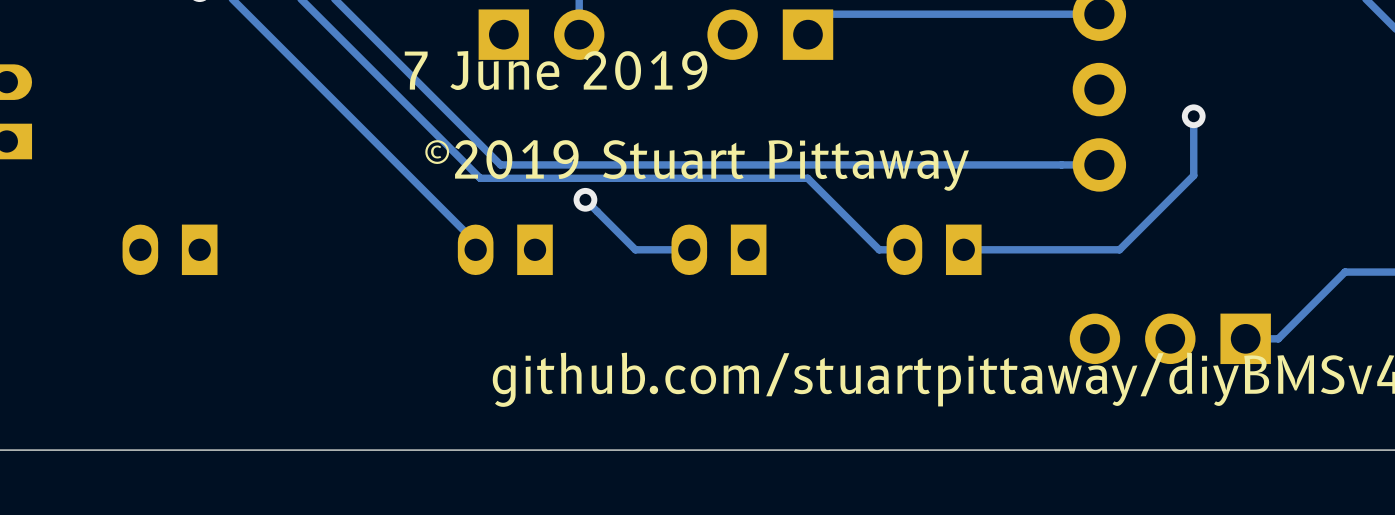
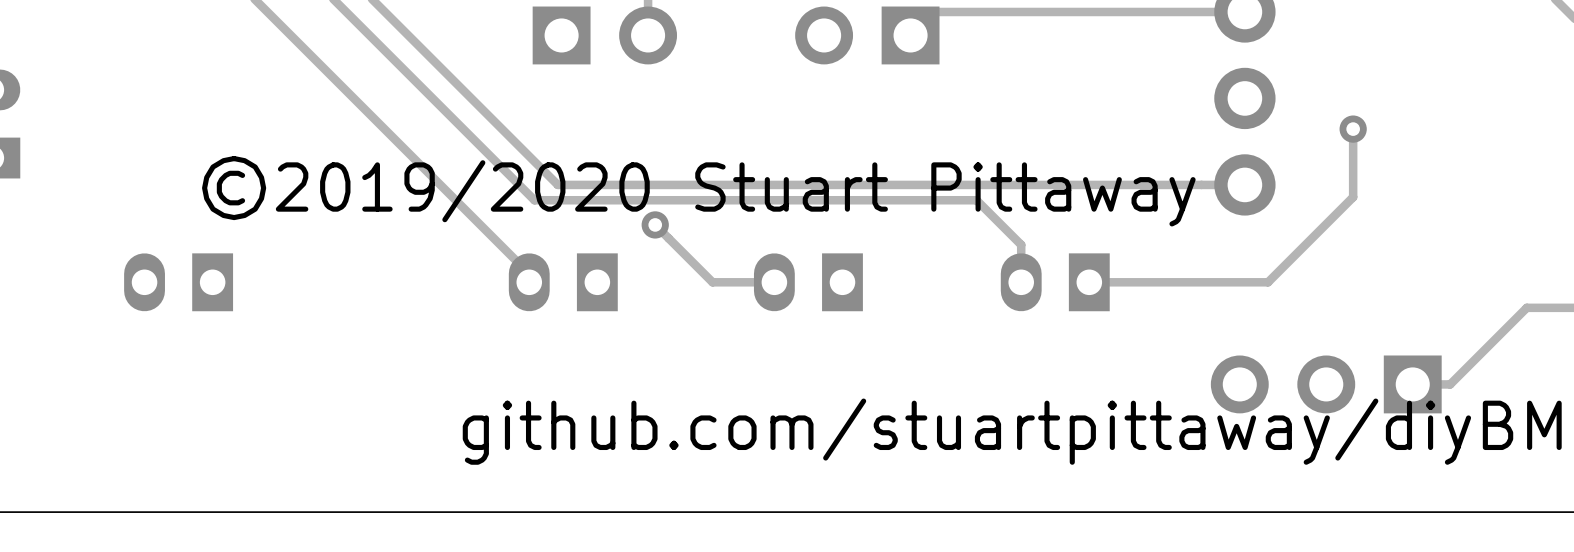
text: 7 June 2019 (556, 70) -> none
text: ©2019 Stuart Pittaway (697, 165) -> ©2019/2020 Stuart Pittaway (698, 191)
track: (807, 178) (879, 249) (904, 249) -> (910, 200) (976, 200) (1021, 244) (1021, 282)

